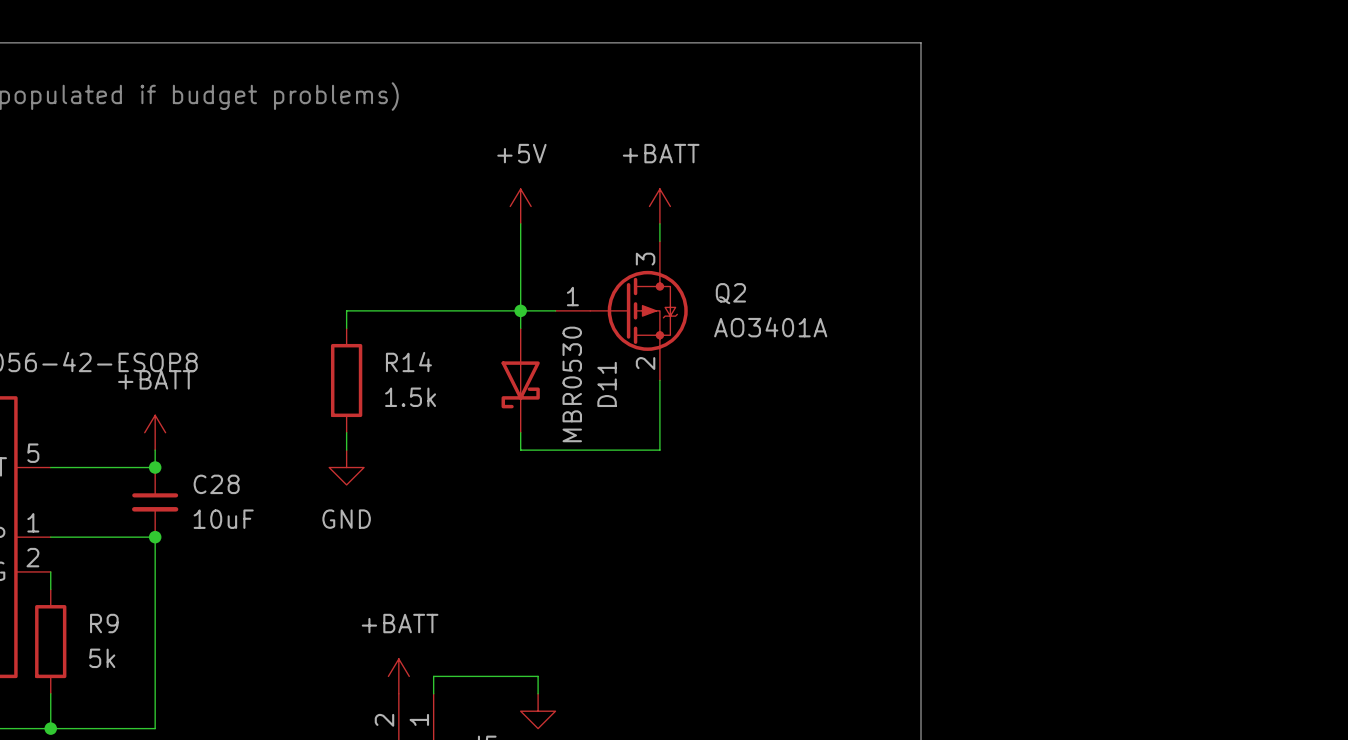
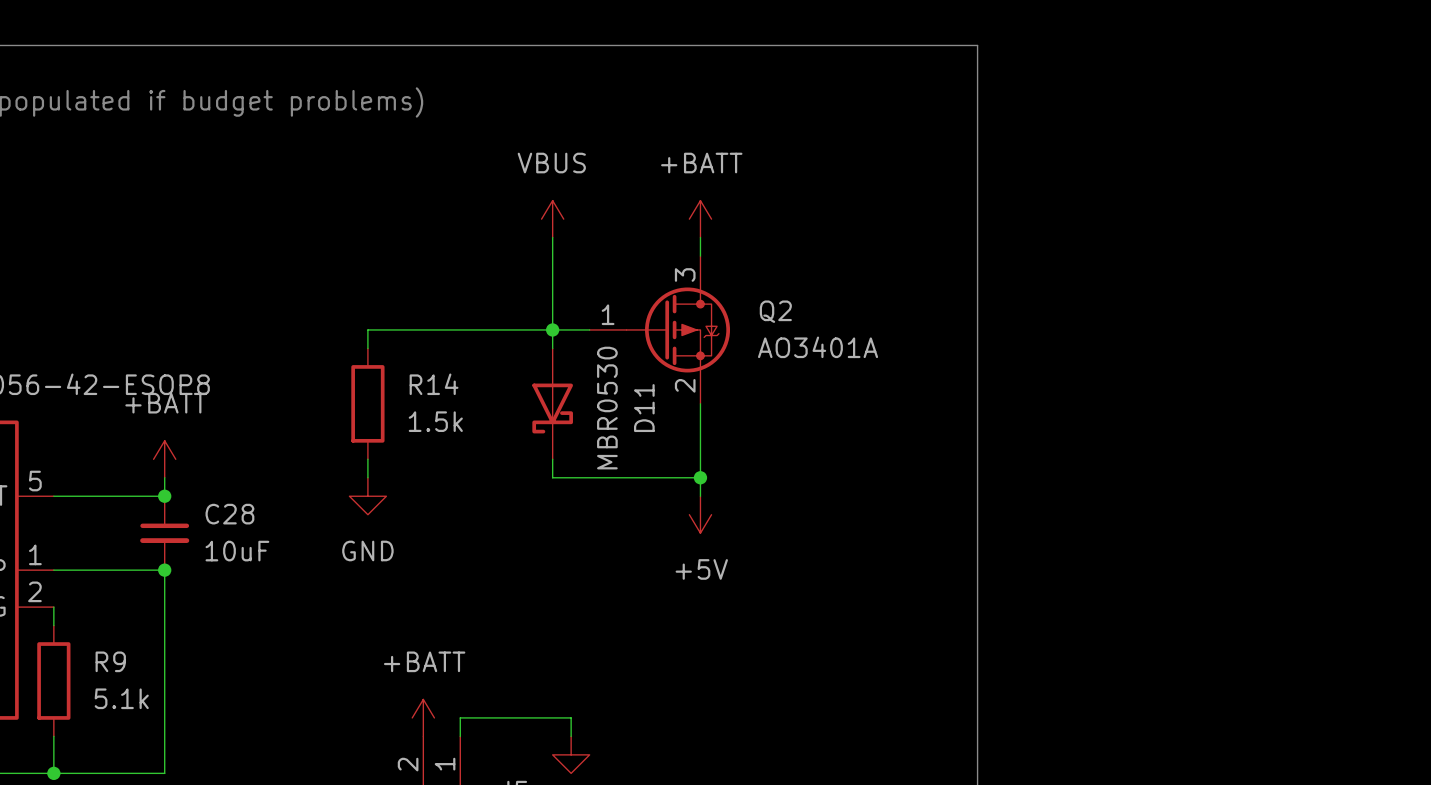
power symbol: +5V (520, 206) -> VBUS (552, 219)
wire: none -> (700, 477) (700, 496)
junction: none -> (700, 477)
power symbol: none -> +5V (700, 514)
R9 value: 5k (102, 658) -> 5.1k (121, 698)

